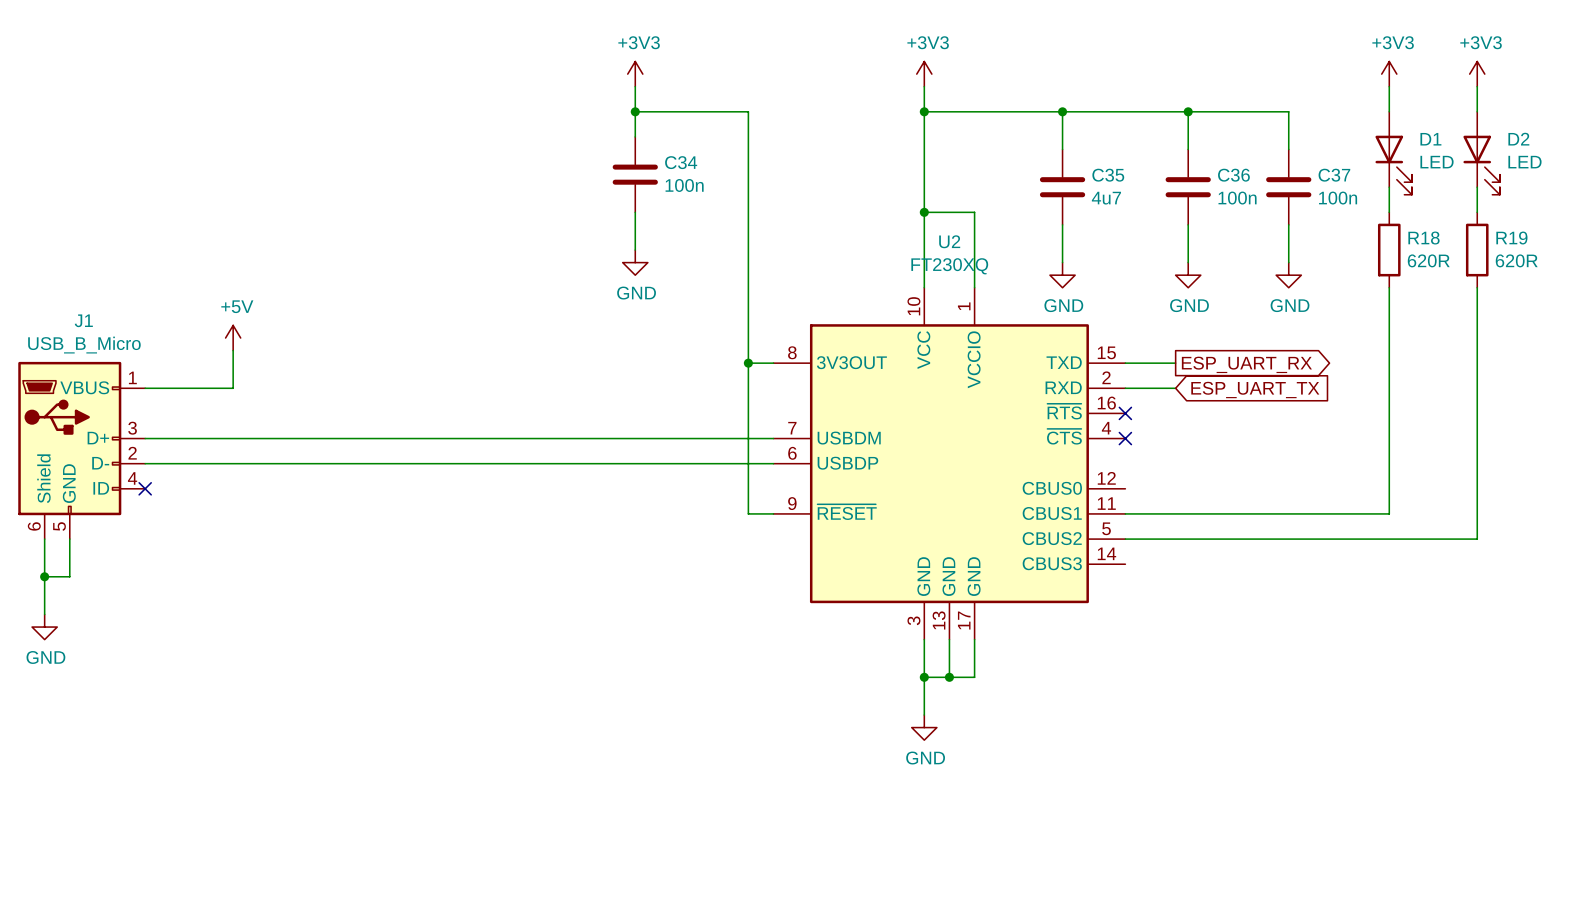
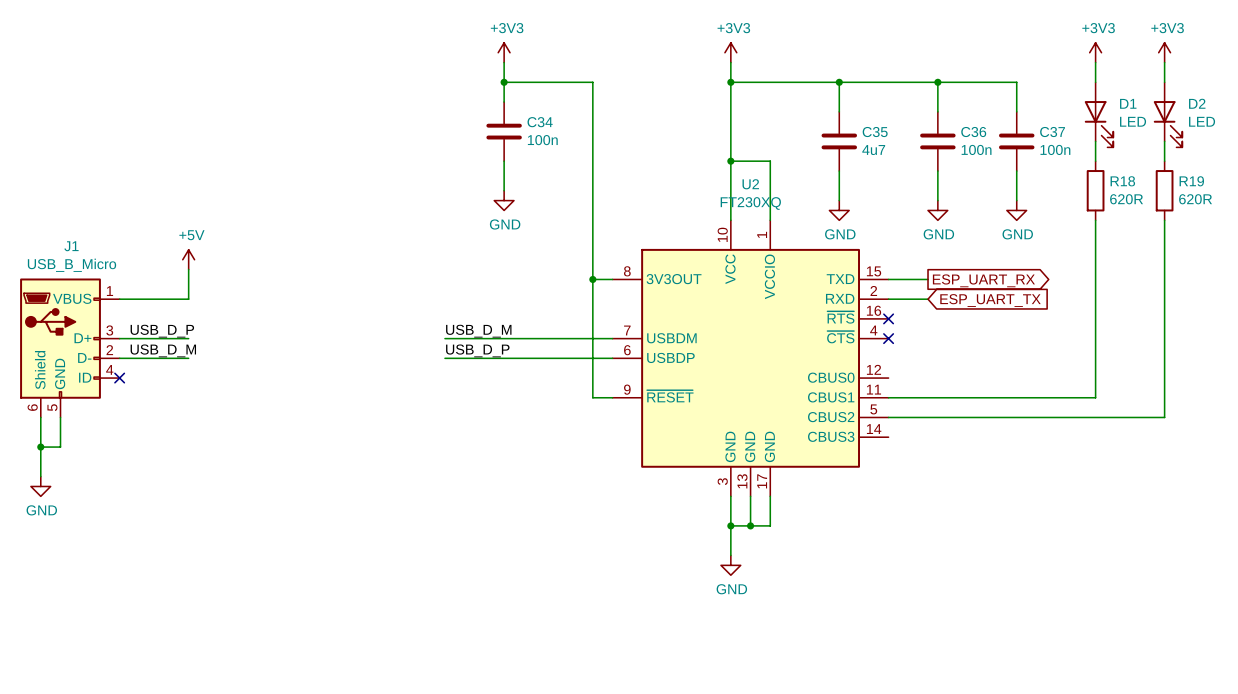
label: none -> USB_D_P (162, 331)
label: none -> USB_D_M (478, 331)
wire: (233, 438) (559, 438) -> none
label: none -> USB_D_M (163, 350)
label: none -> USB_D_P (477, 350)
wire: (233, 463) (559, 463) -> none

